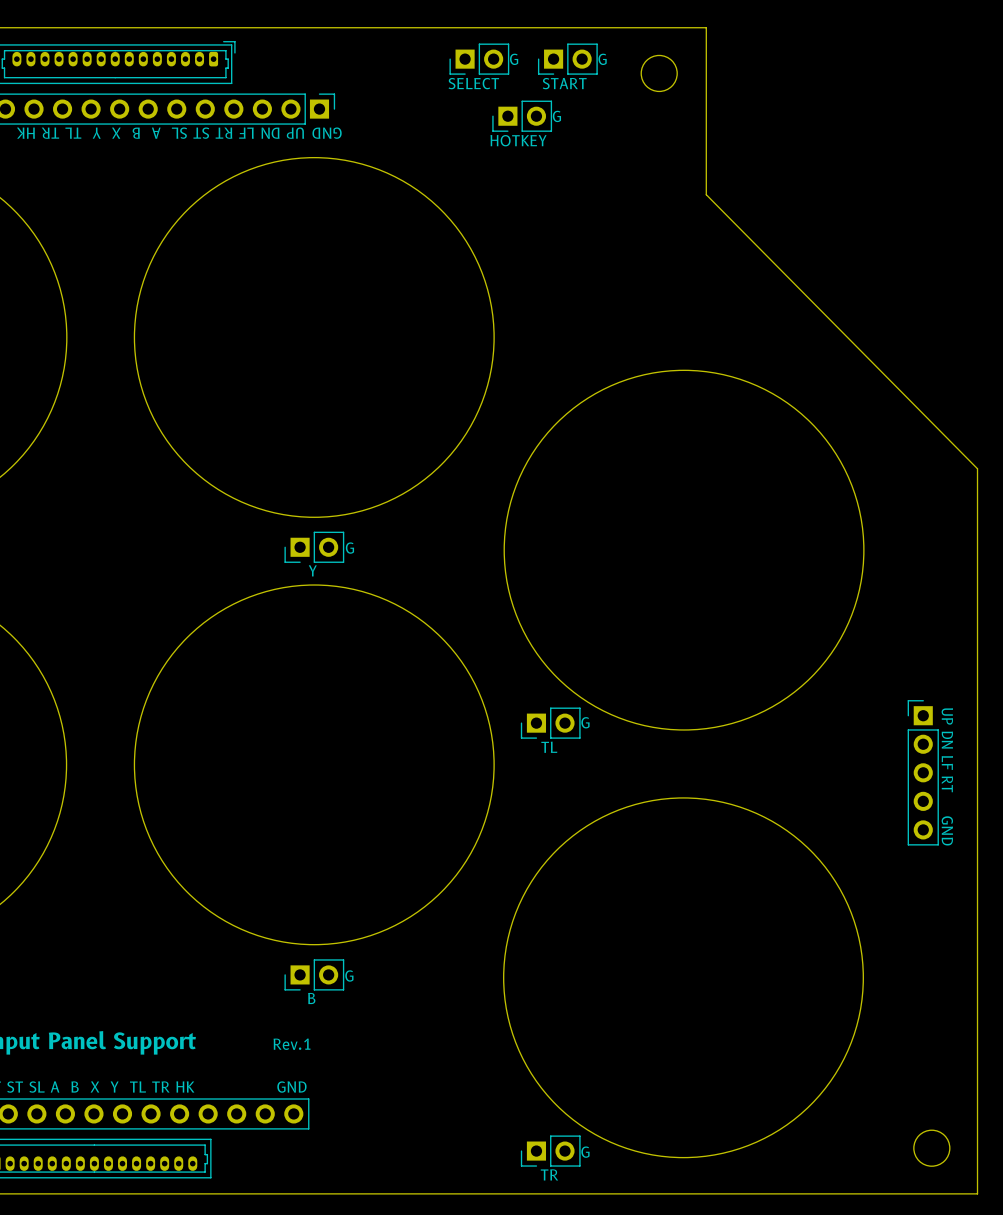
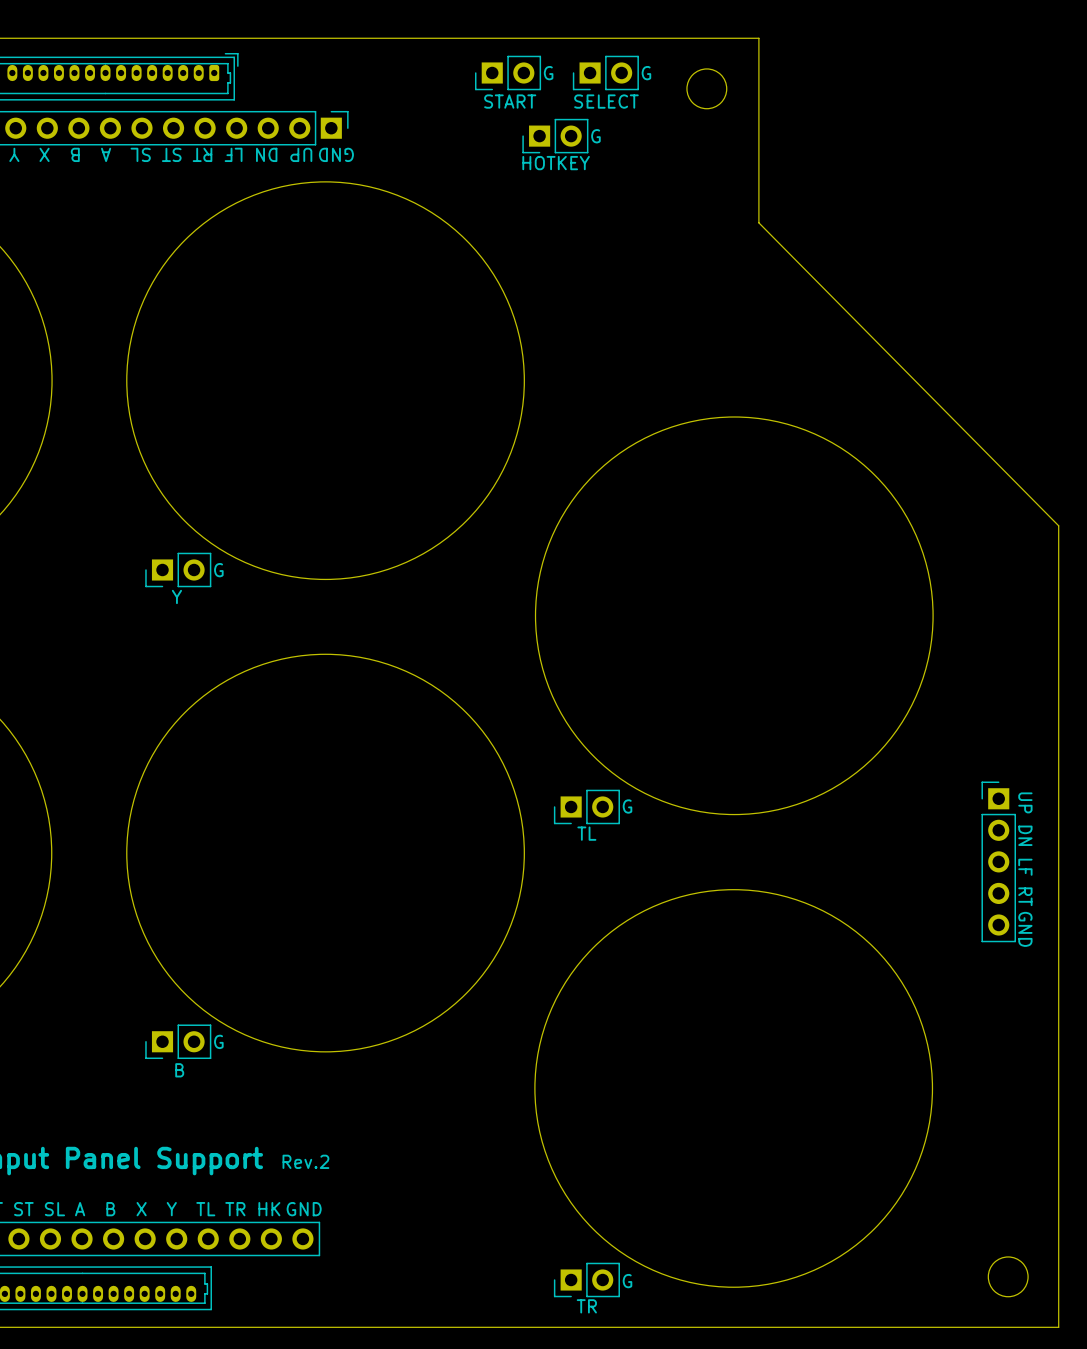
text position: SELECT (473, 83) -> SELECT (606, 101)
text position: START (564, 83) -> START (510, 101)
part position: (314, 547) -> (178, 569)
text position: G (349, 548) -> G (218, 570)
text position: Y (312, 570) -> Y (176, 596)
part position: (314, 974) -> (178, 1041)
text position: G (349, 976) -> G (218, 1041)
text position: B (311, 998) -> B (179, 1070)
text: Rev.1 (292, 1044) -> Rev.2 (305, 1161)

